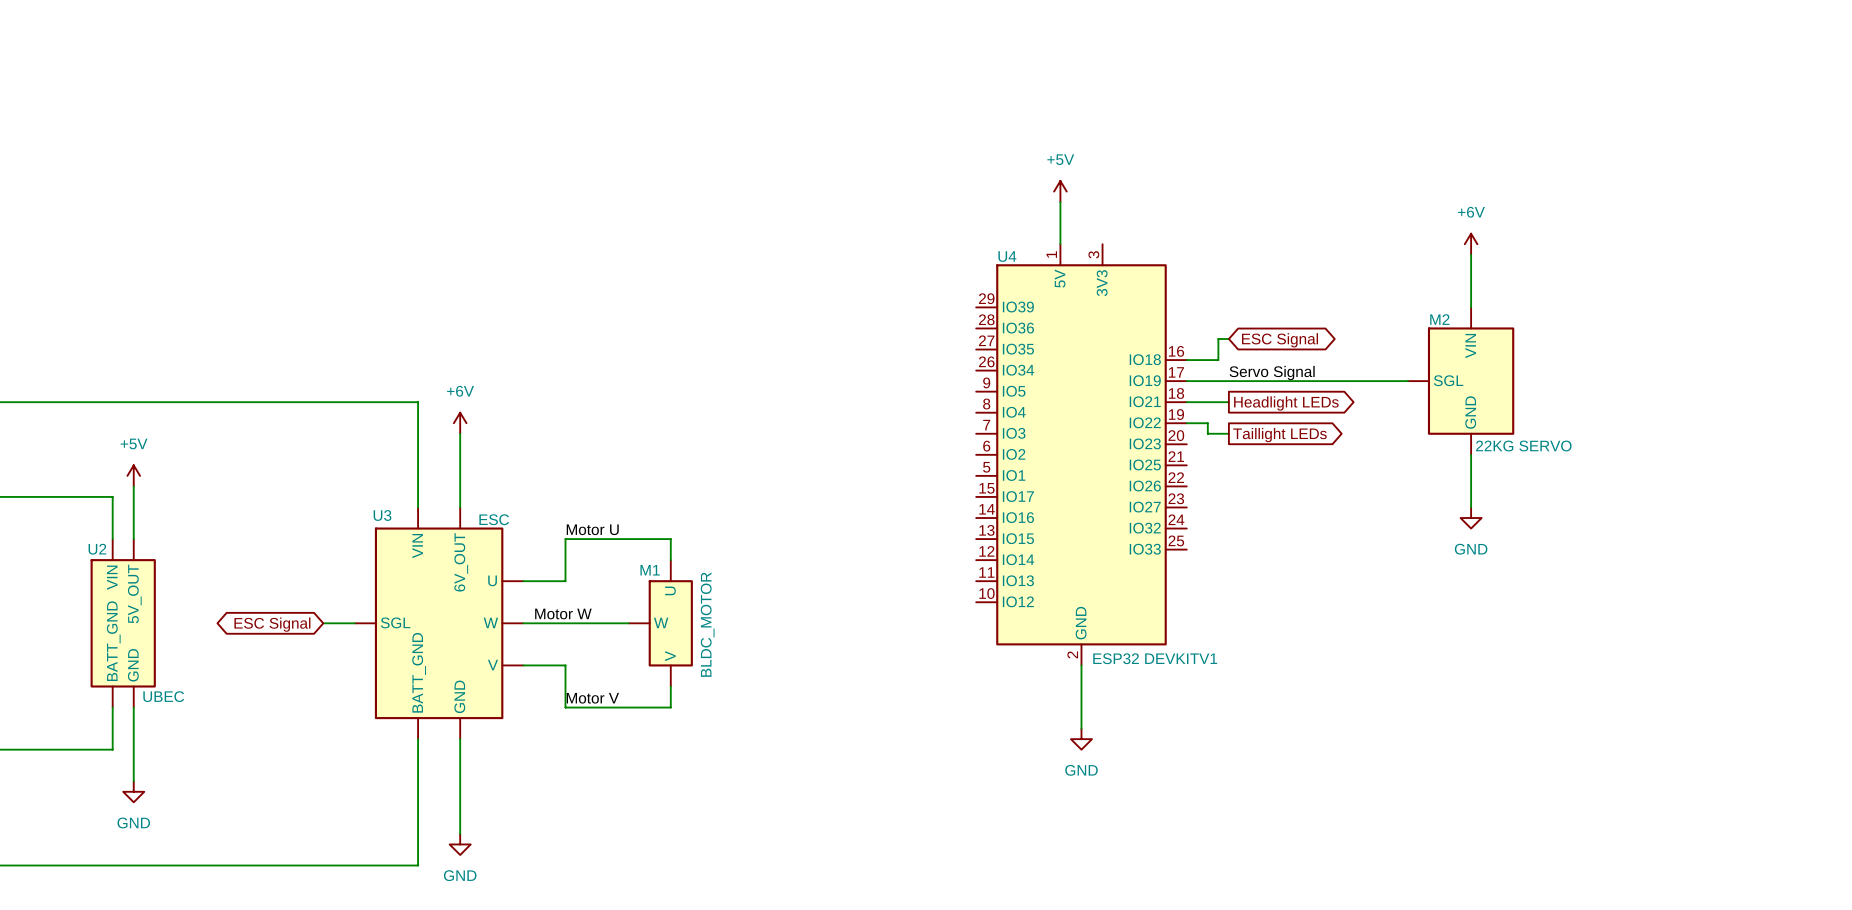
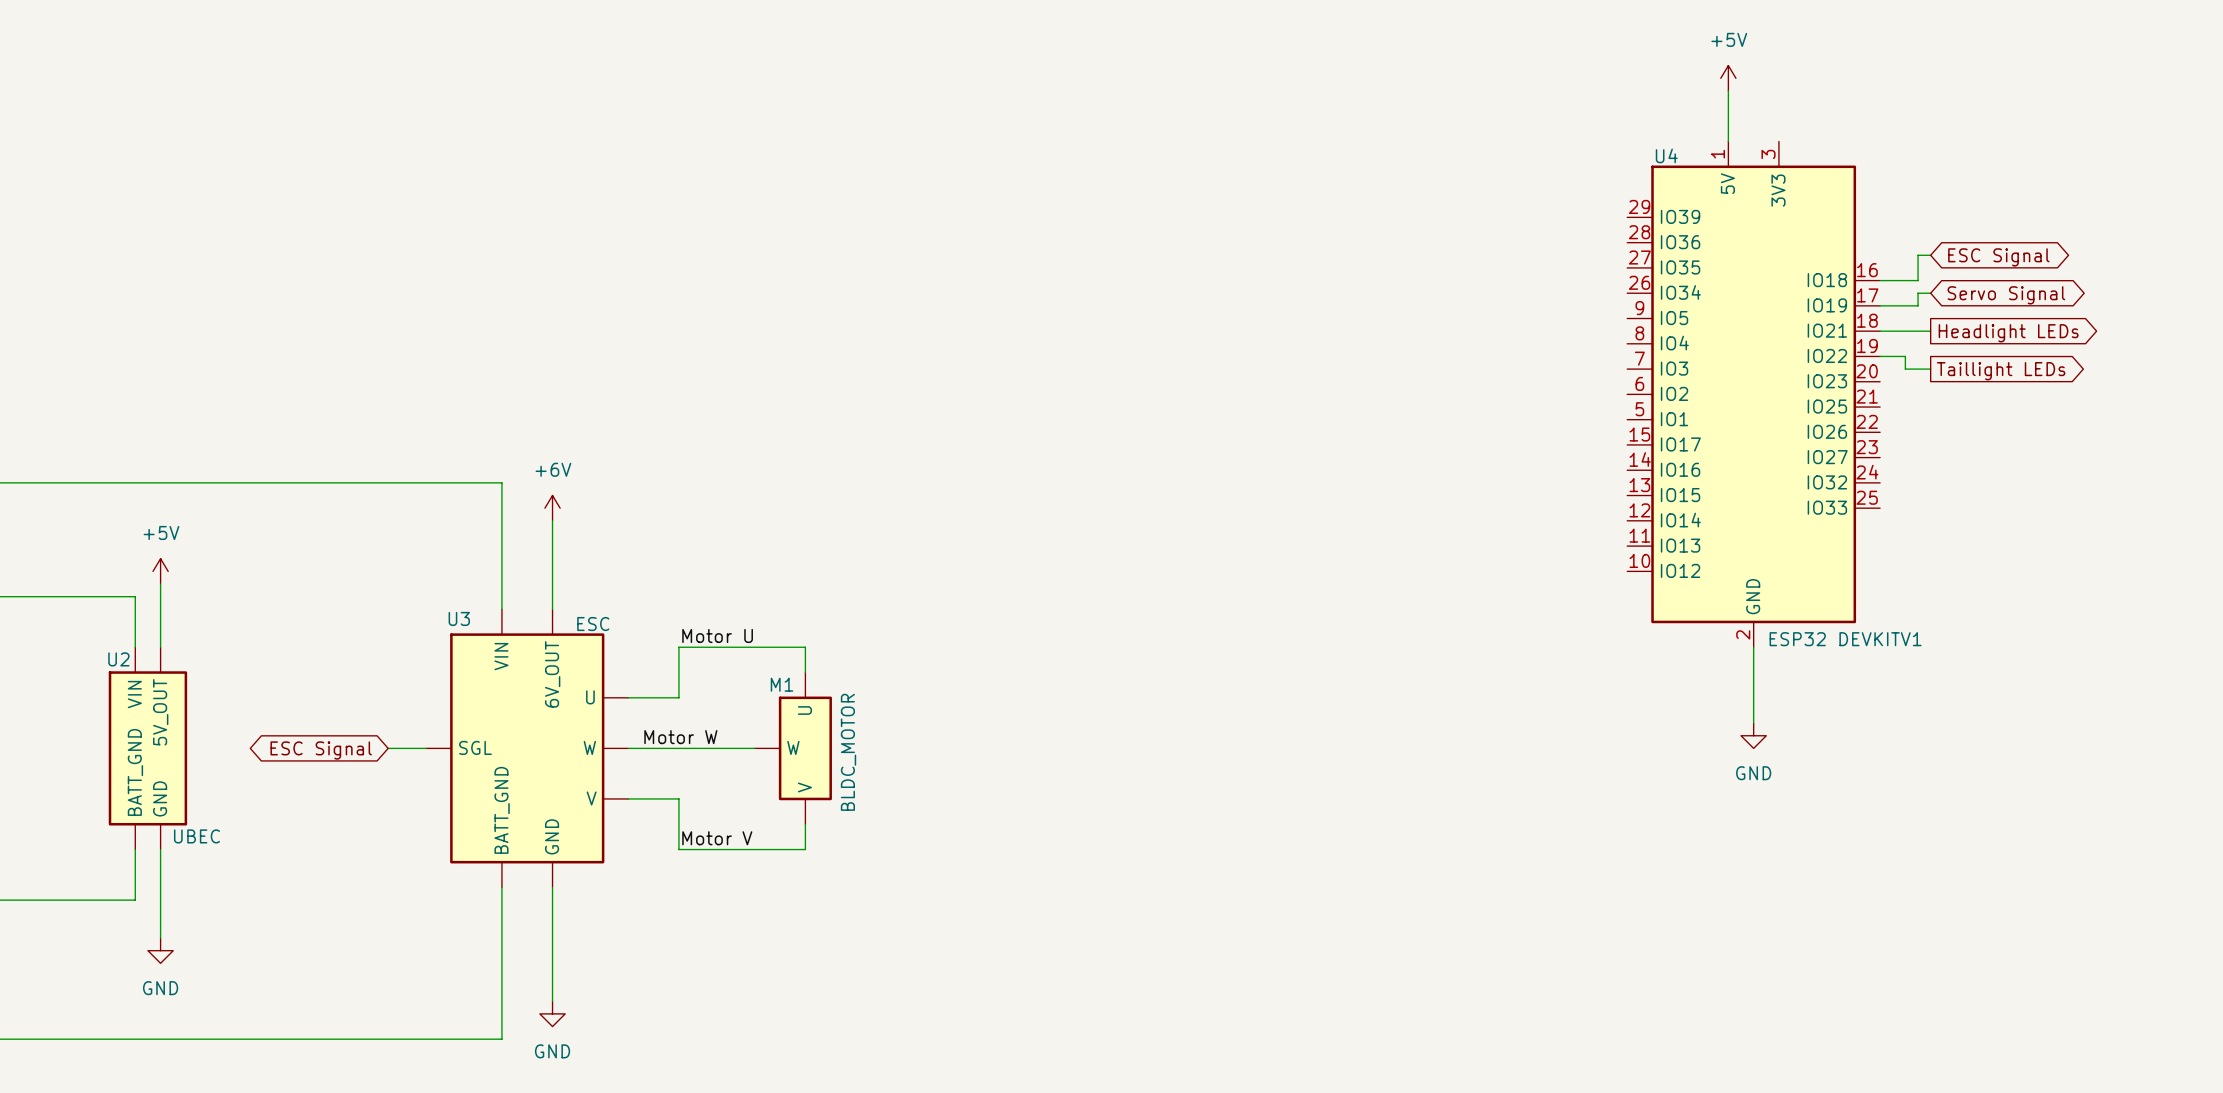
power symbol: none -> +5V (1728, 78)
wire: none -> (1728, 90) (1728, 141)
power symbol: +5V (1060, 191) -> none
wire: (1060, 202) (1060, 244) -> none
wire: none -> (1930, 255) (1918, 255) (1918, 280) (1880, 280)
global label: none -> ESC Signal (1998, 257)
power symbol: +6V (1471, 244) -> none
wire: none -> (1930, 293) (1918, 293) (1918, 305) (1880, 305)
global label: none -> Servo Signal (2006, 295)
wire: none -> (1880, 331) (1930, 331)
global label: none -> Headlight LEDs (2008, 333)
wire: none -> (1880, 356) (1905, 356) (1905, 369) (1930, 369)
global label: none -> Taillight LEDs (2001, 371)
wire: (1228, 338) (1218, 338) (1218, 360) (1186, 360) -> none
global label: ESC Signal (1280, 340) -> none
label: Servo Signal (1272, 373) -> none
wire: (1186, 381) (1407, 381) -> none
M2: 22KG SERVO (1461, 381) -> none
wire: (1186, 402) (1228, 402) -> none
global label: Headlight LEDs (1286, 403) -> none
wire: (1186, 423) (1207, 423) (1207, 433) (1228, 433) -> none
global label: Taillight LEDs (1279, 435) -> none
U4 position: (1081, 454) -> (1753, 394)
power symbol position: GND (1471, 518) -> GND (1753, 735)
wire: none -> (1753, 647) (1753, 723)
wire: (1081, 665) (1081, 728) -> none
power symbol: GND (1081, 739) -> none

